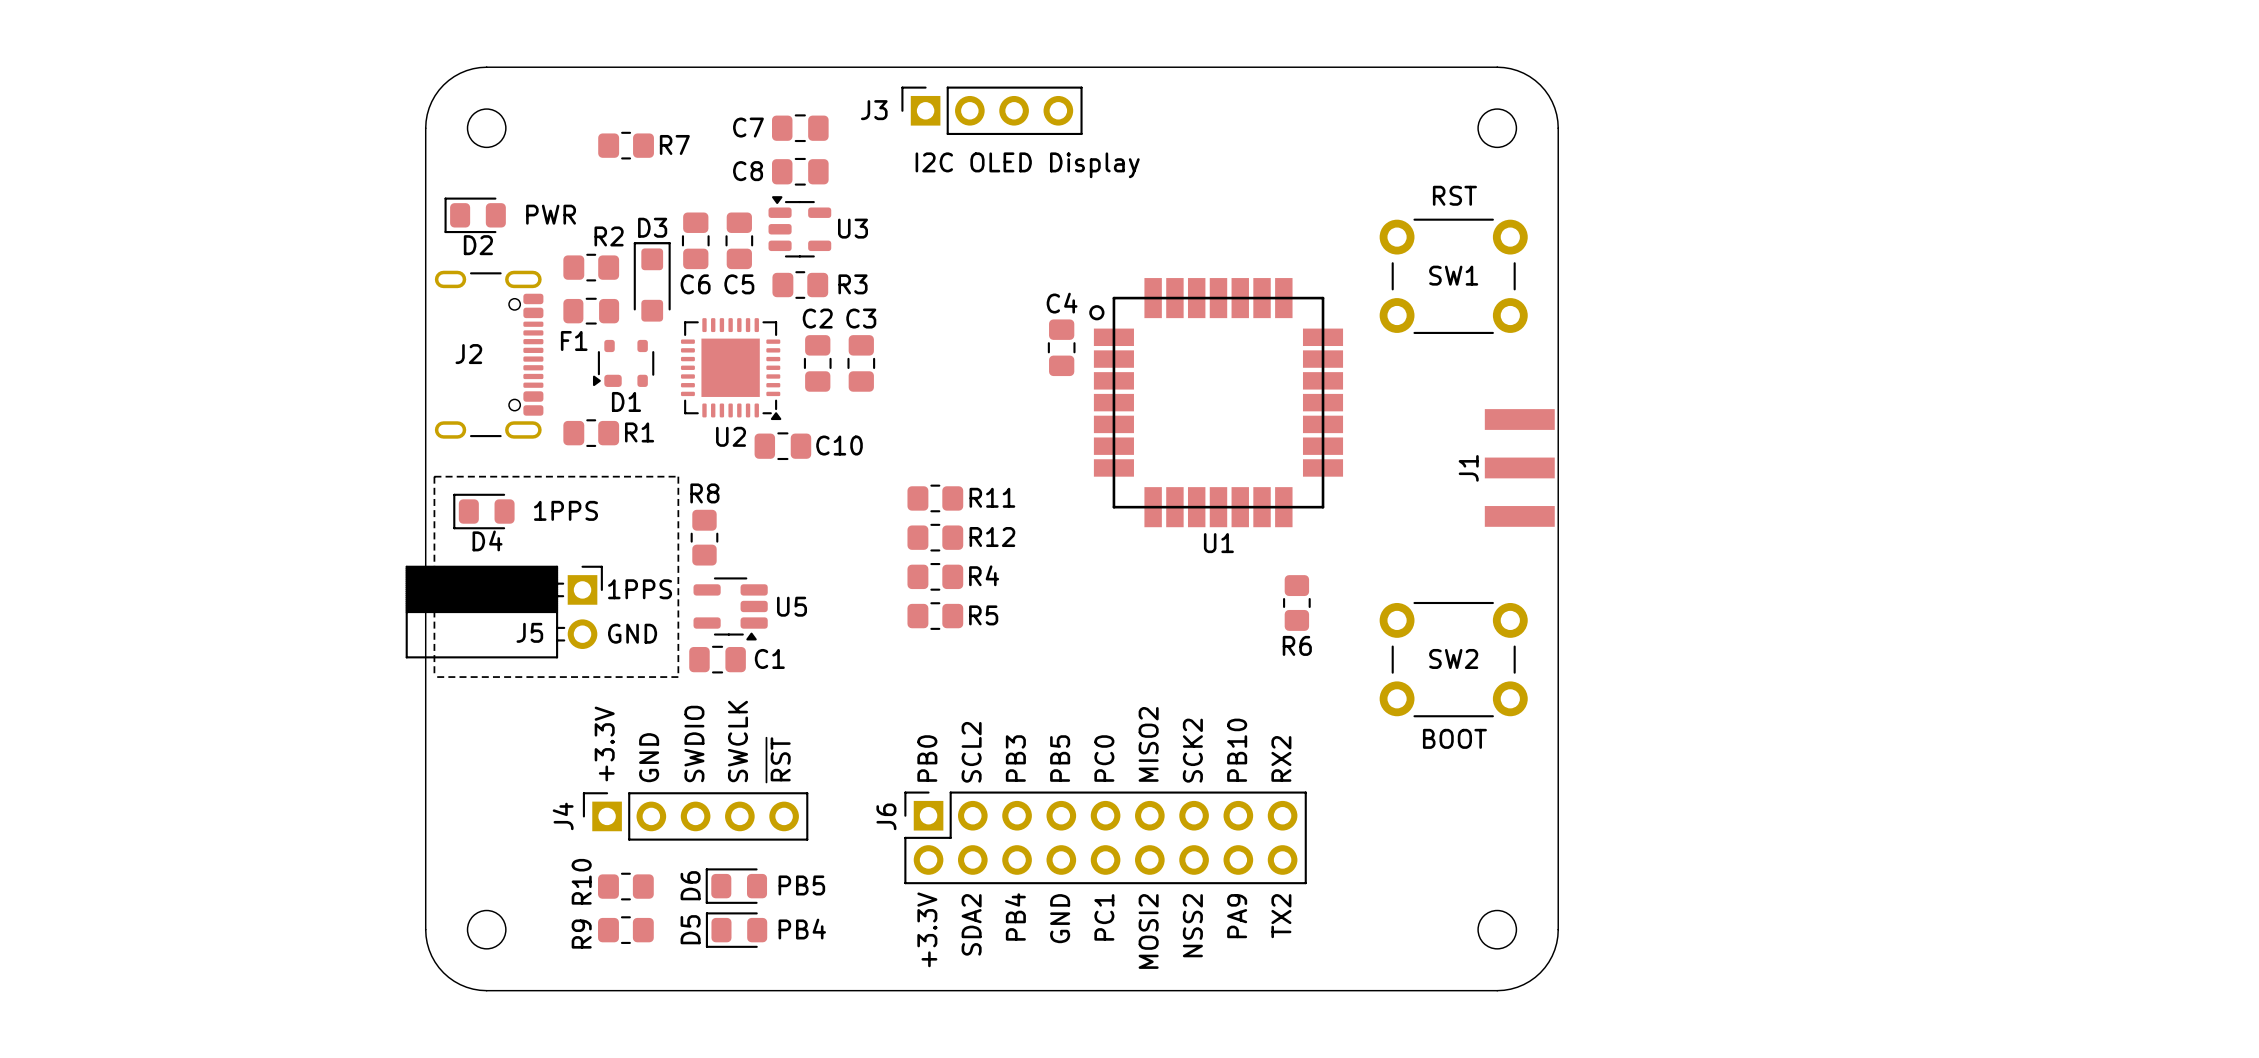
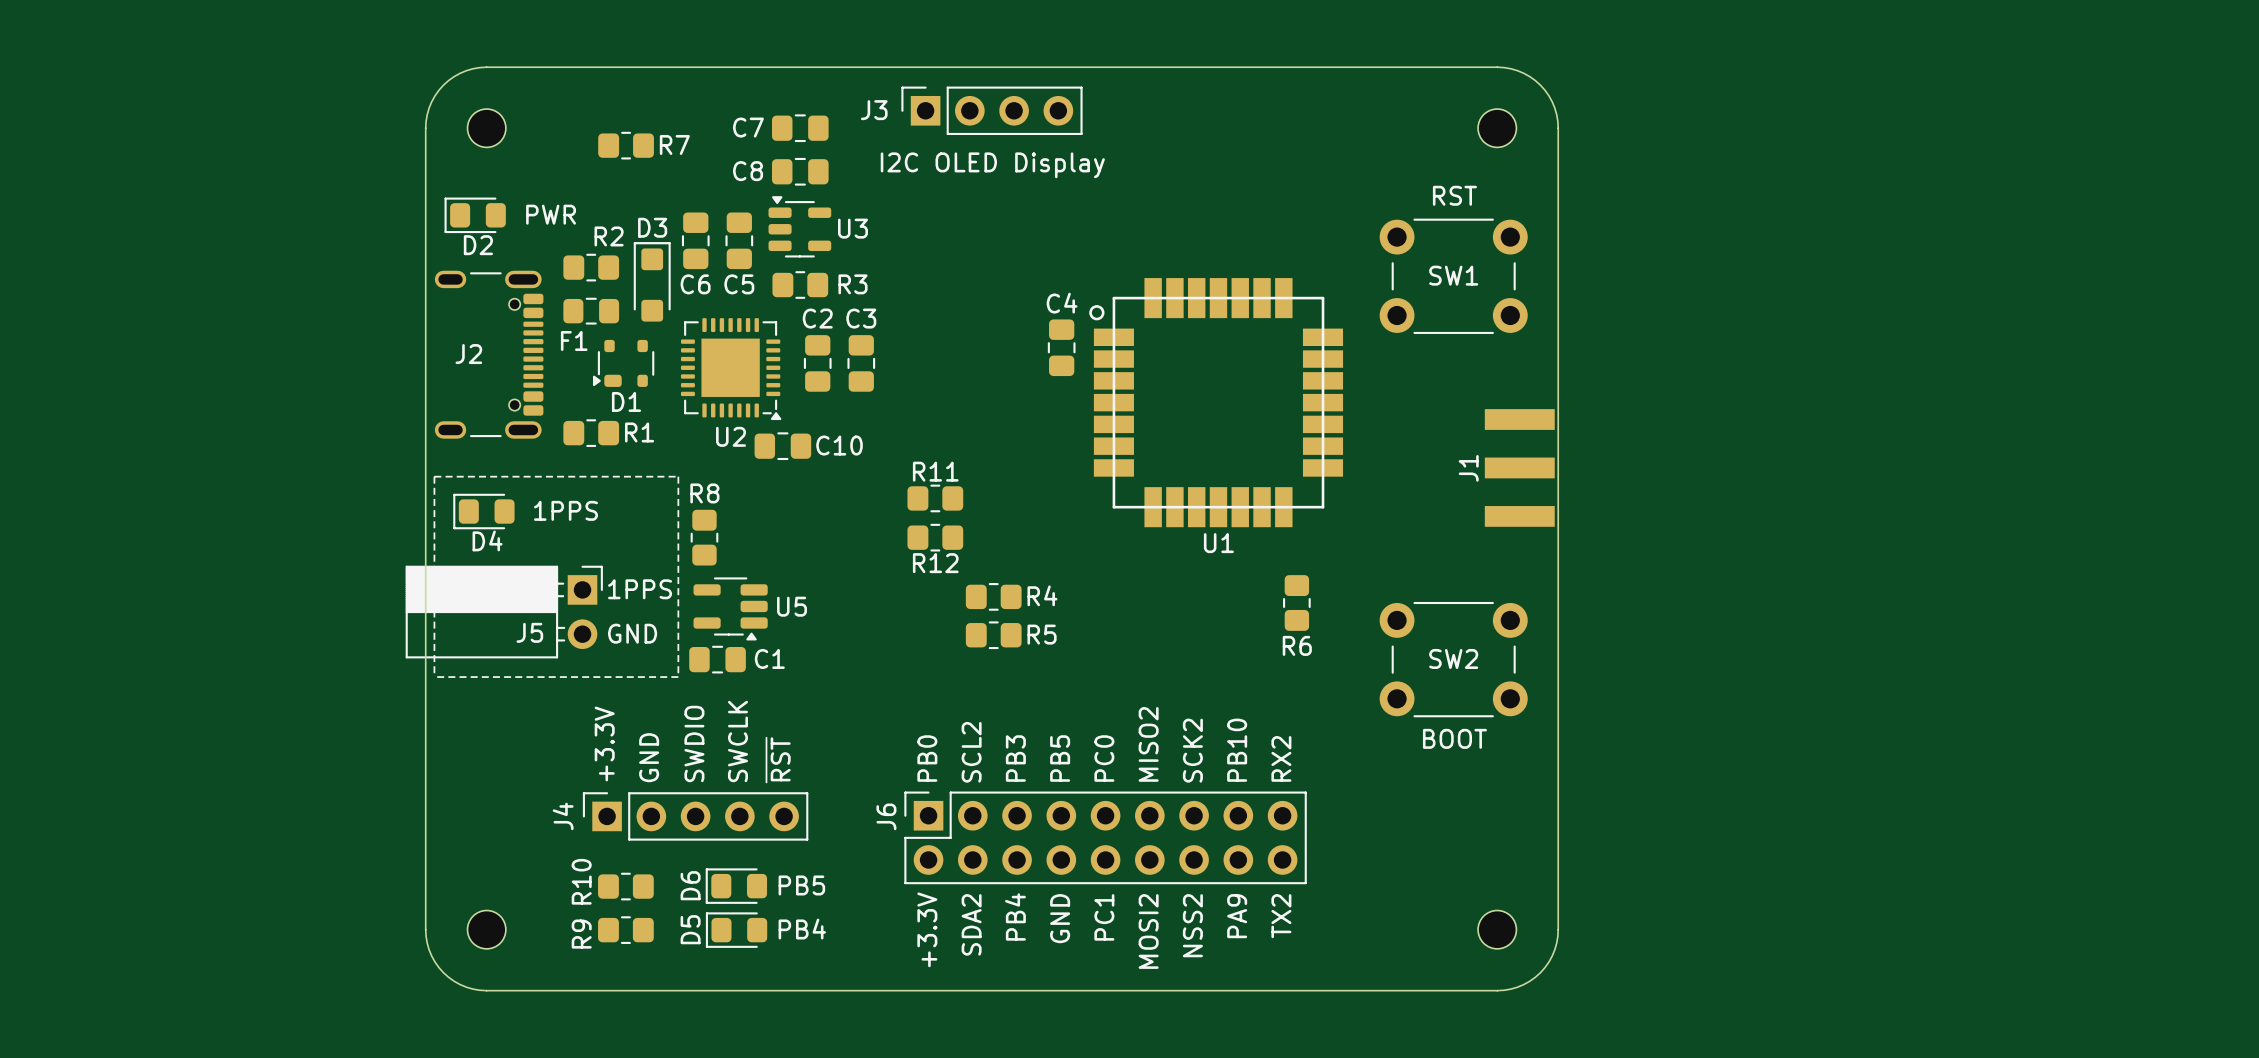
text position: I2C OLED Display (1027, 165) -> I2C OLED Display (992, 165)
R11 name position: R11 (992, 497) -> R11 (935, 471)
R12 name position: R12 (992, 537) -> R12 (935, 563)
R4 position: (935, 576) -> (993, 596)
R5 position: (935, 616) -> (993, 635)

